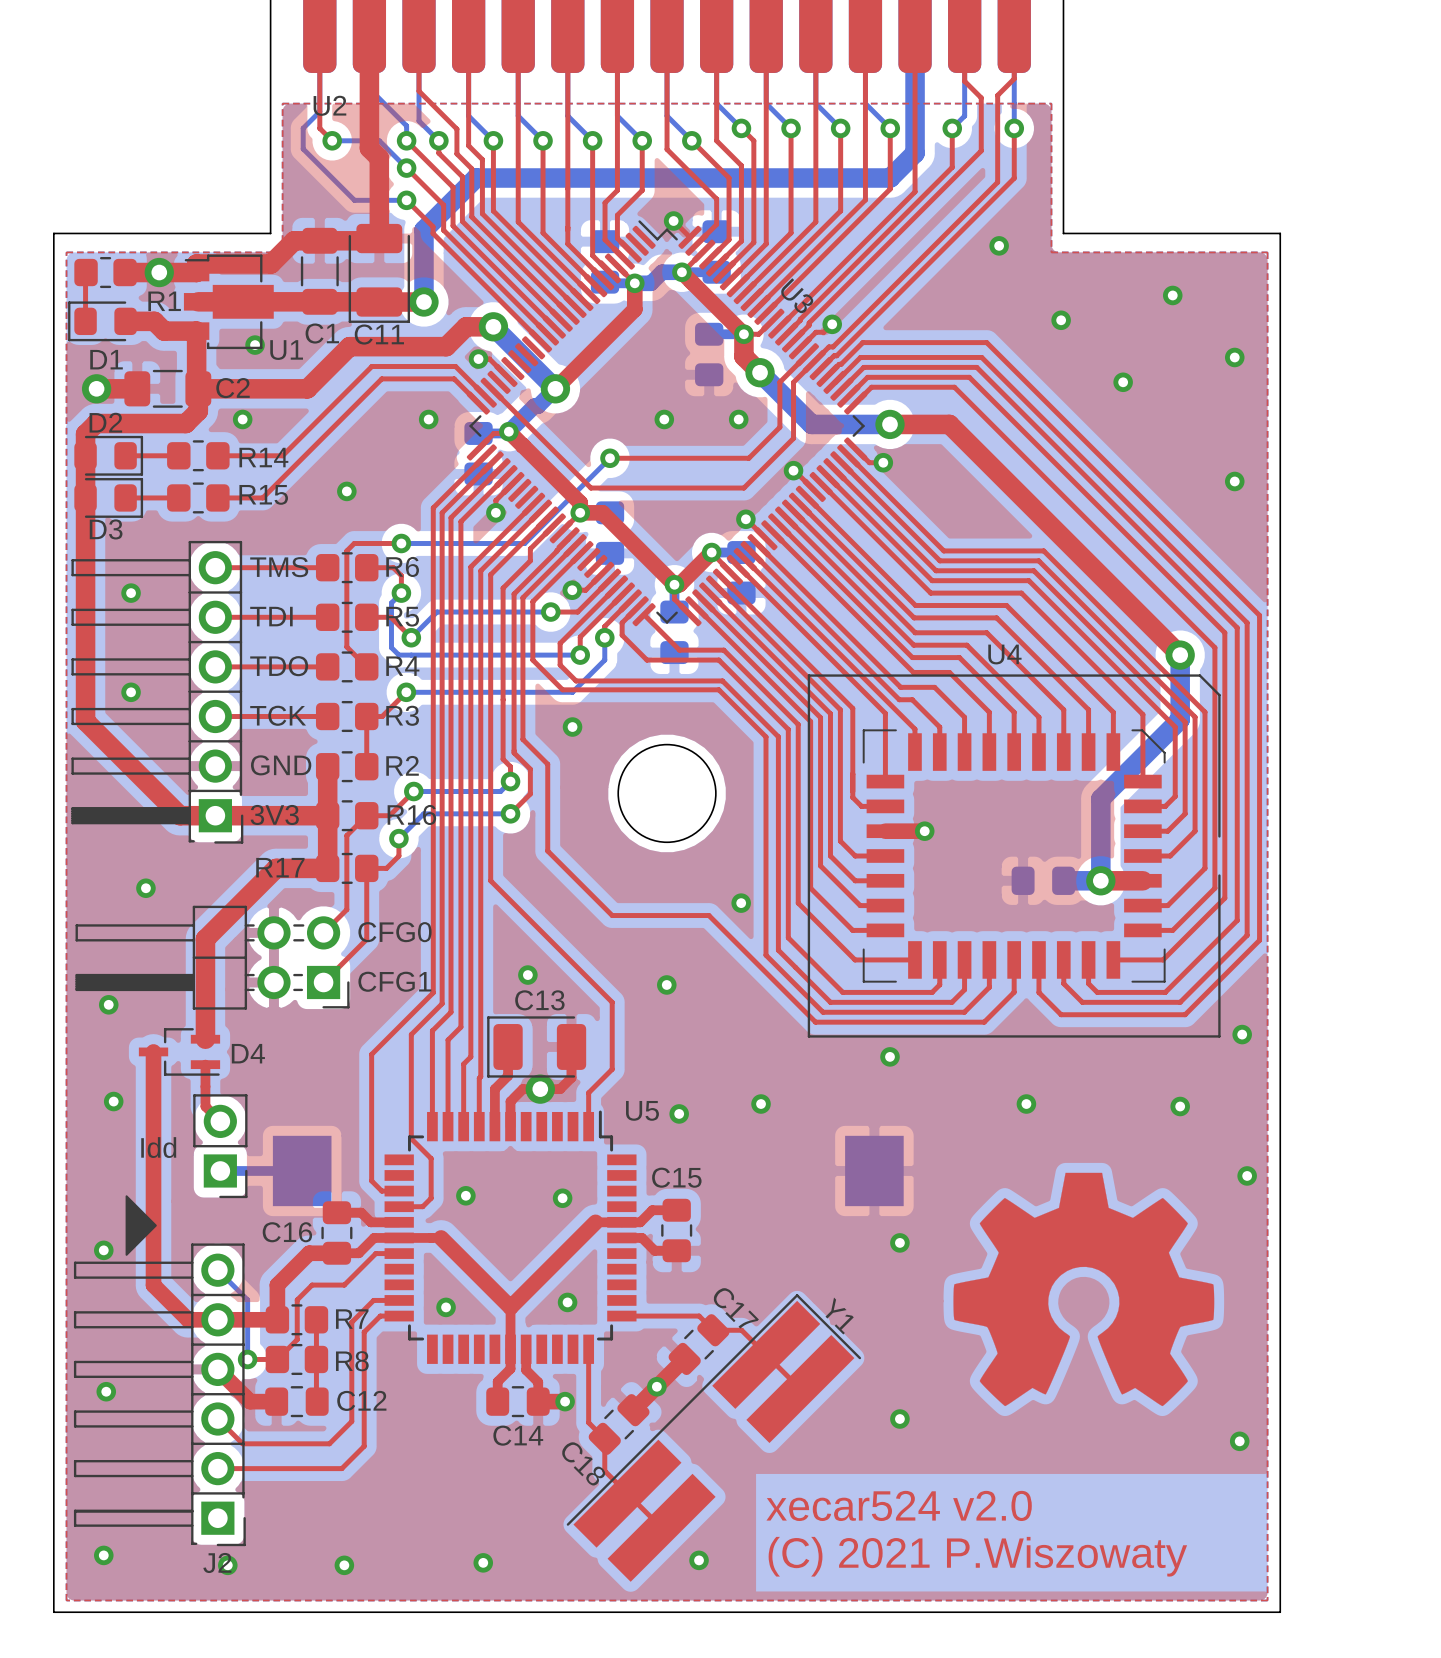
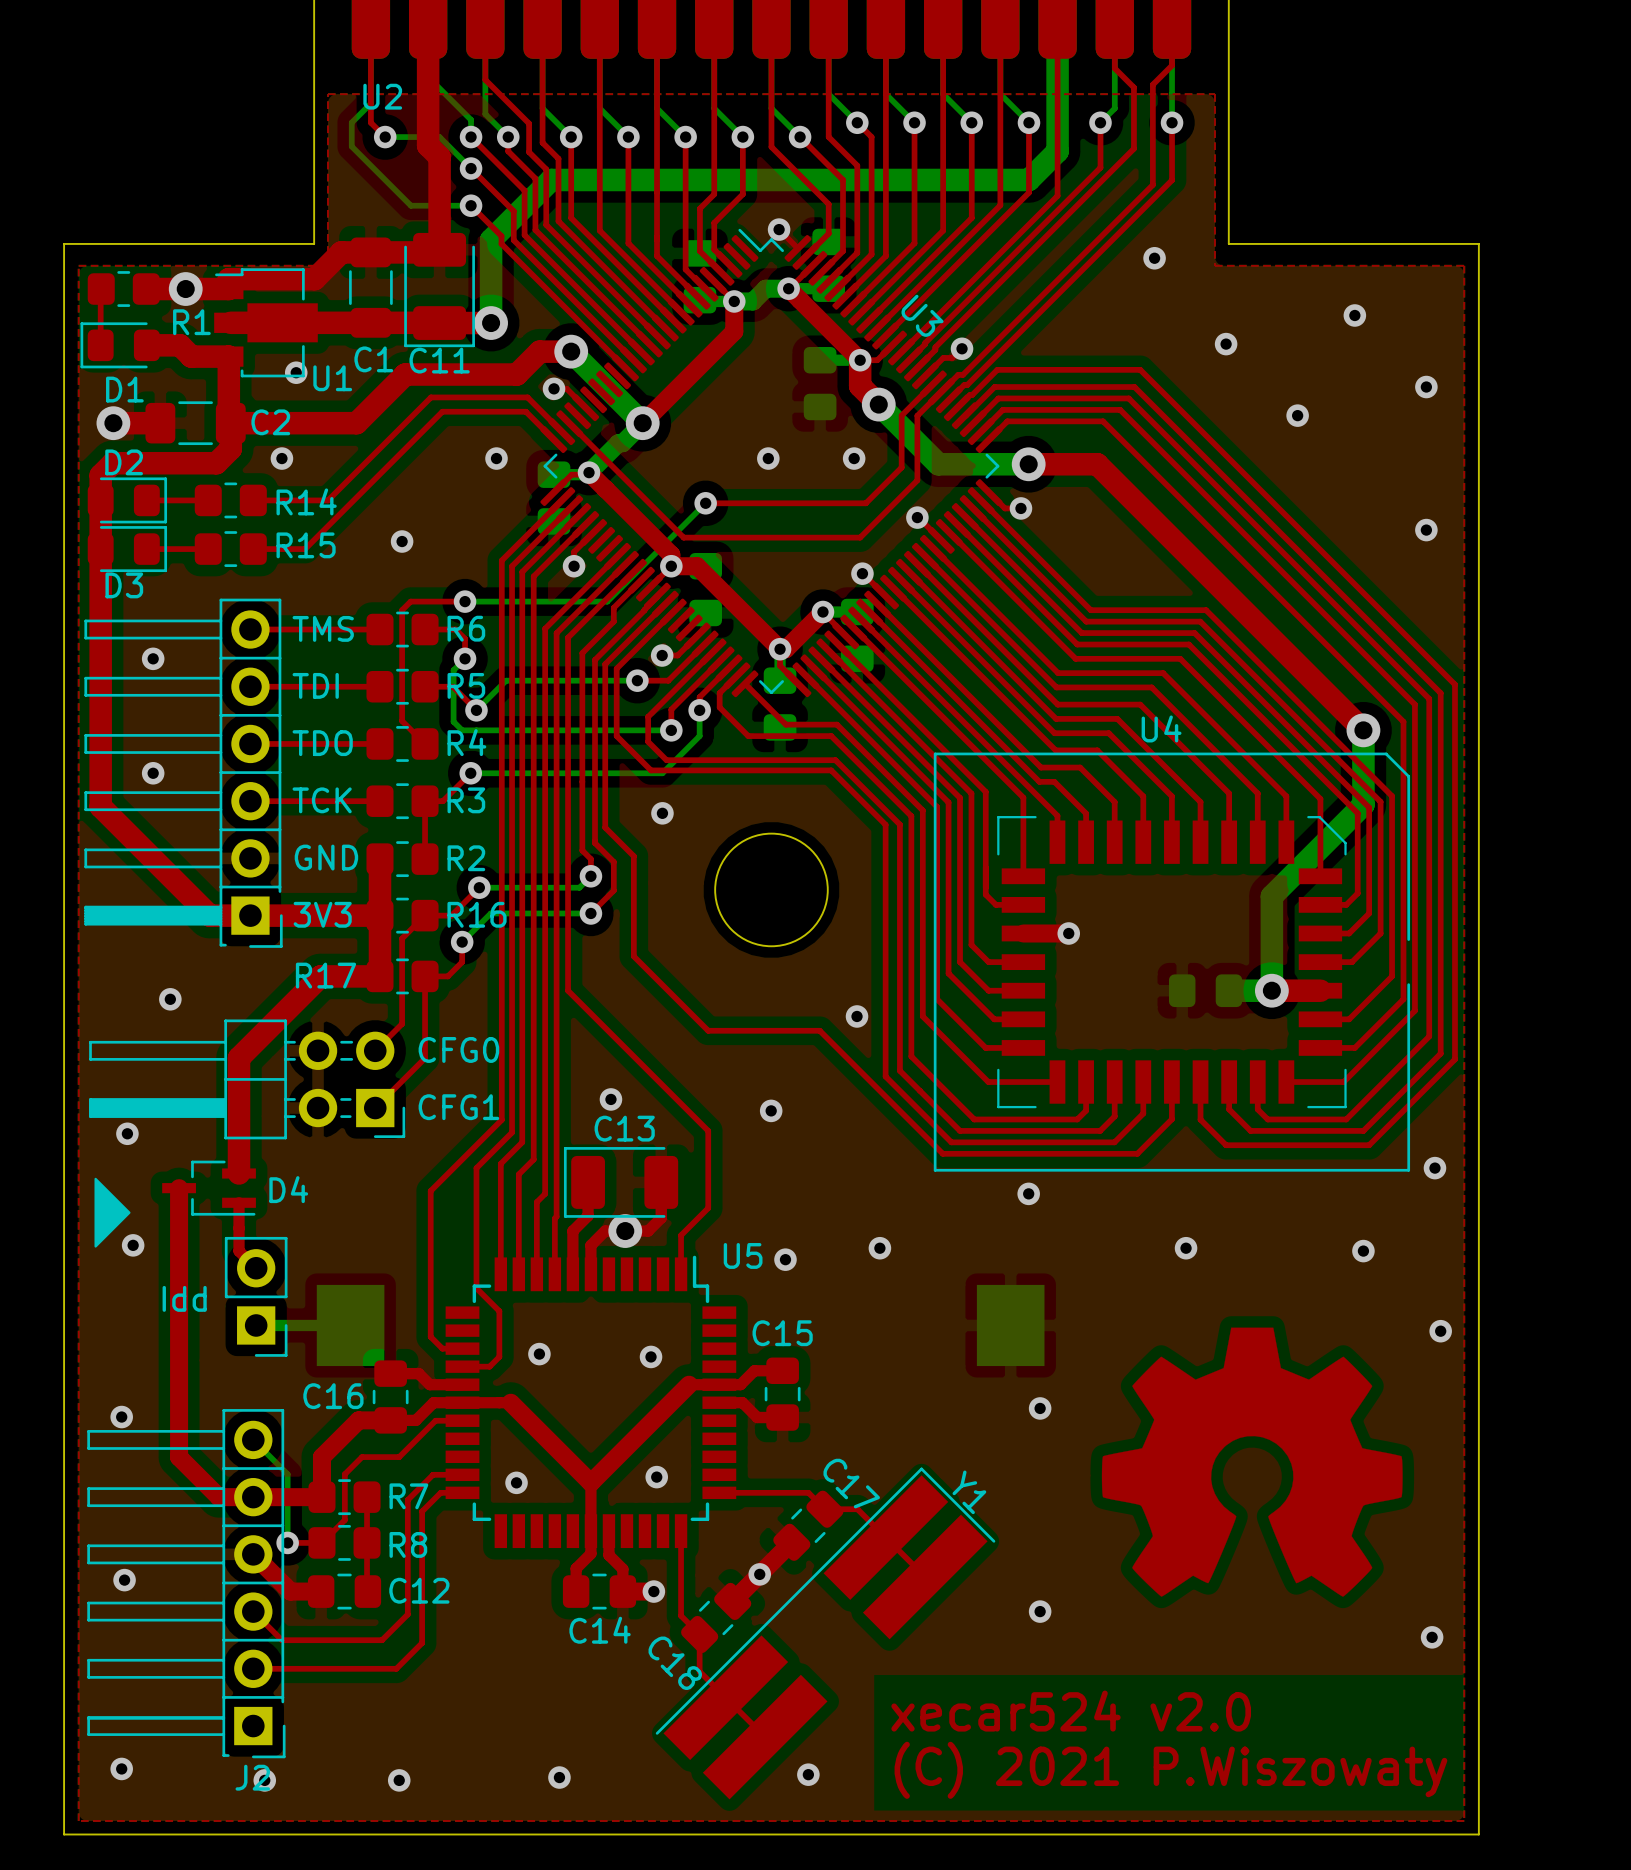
drawing position: (141, 1225) -> (112, 1212)

